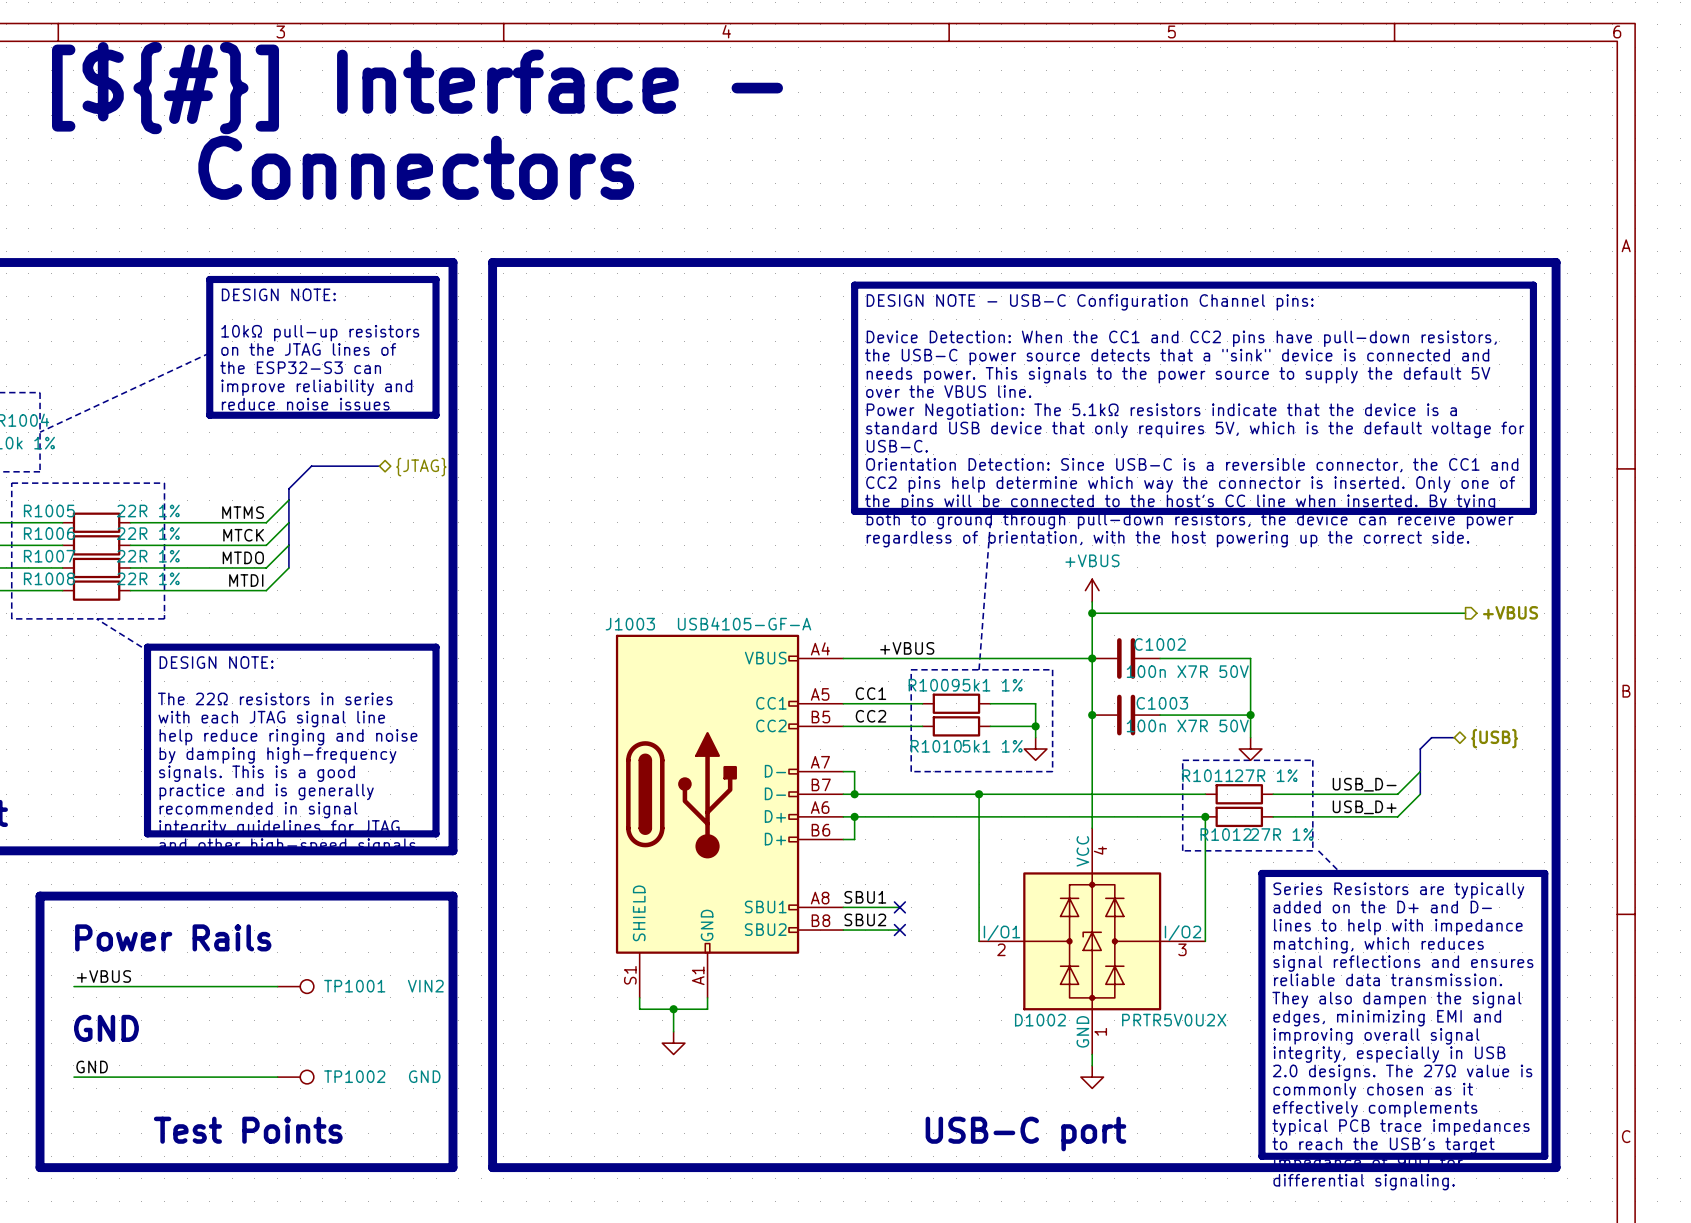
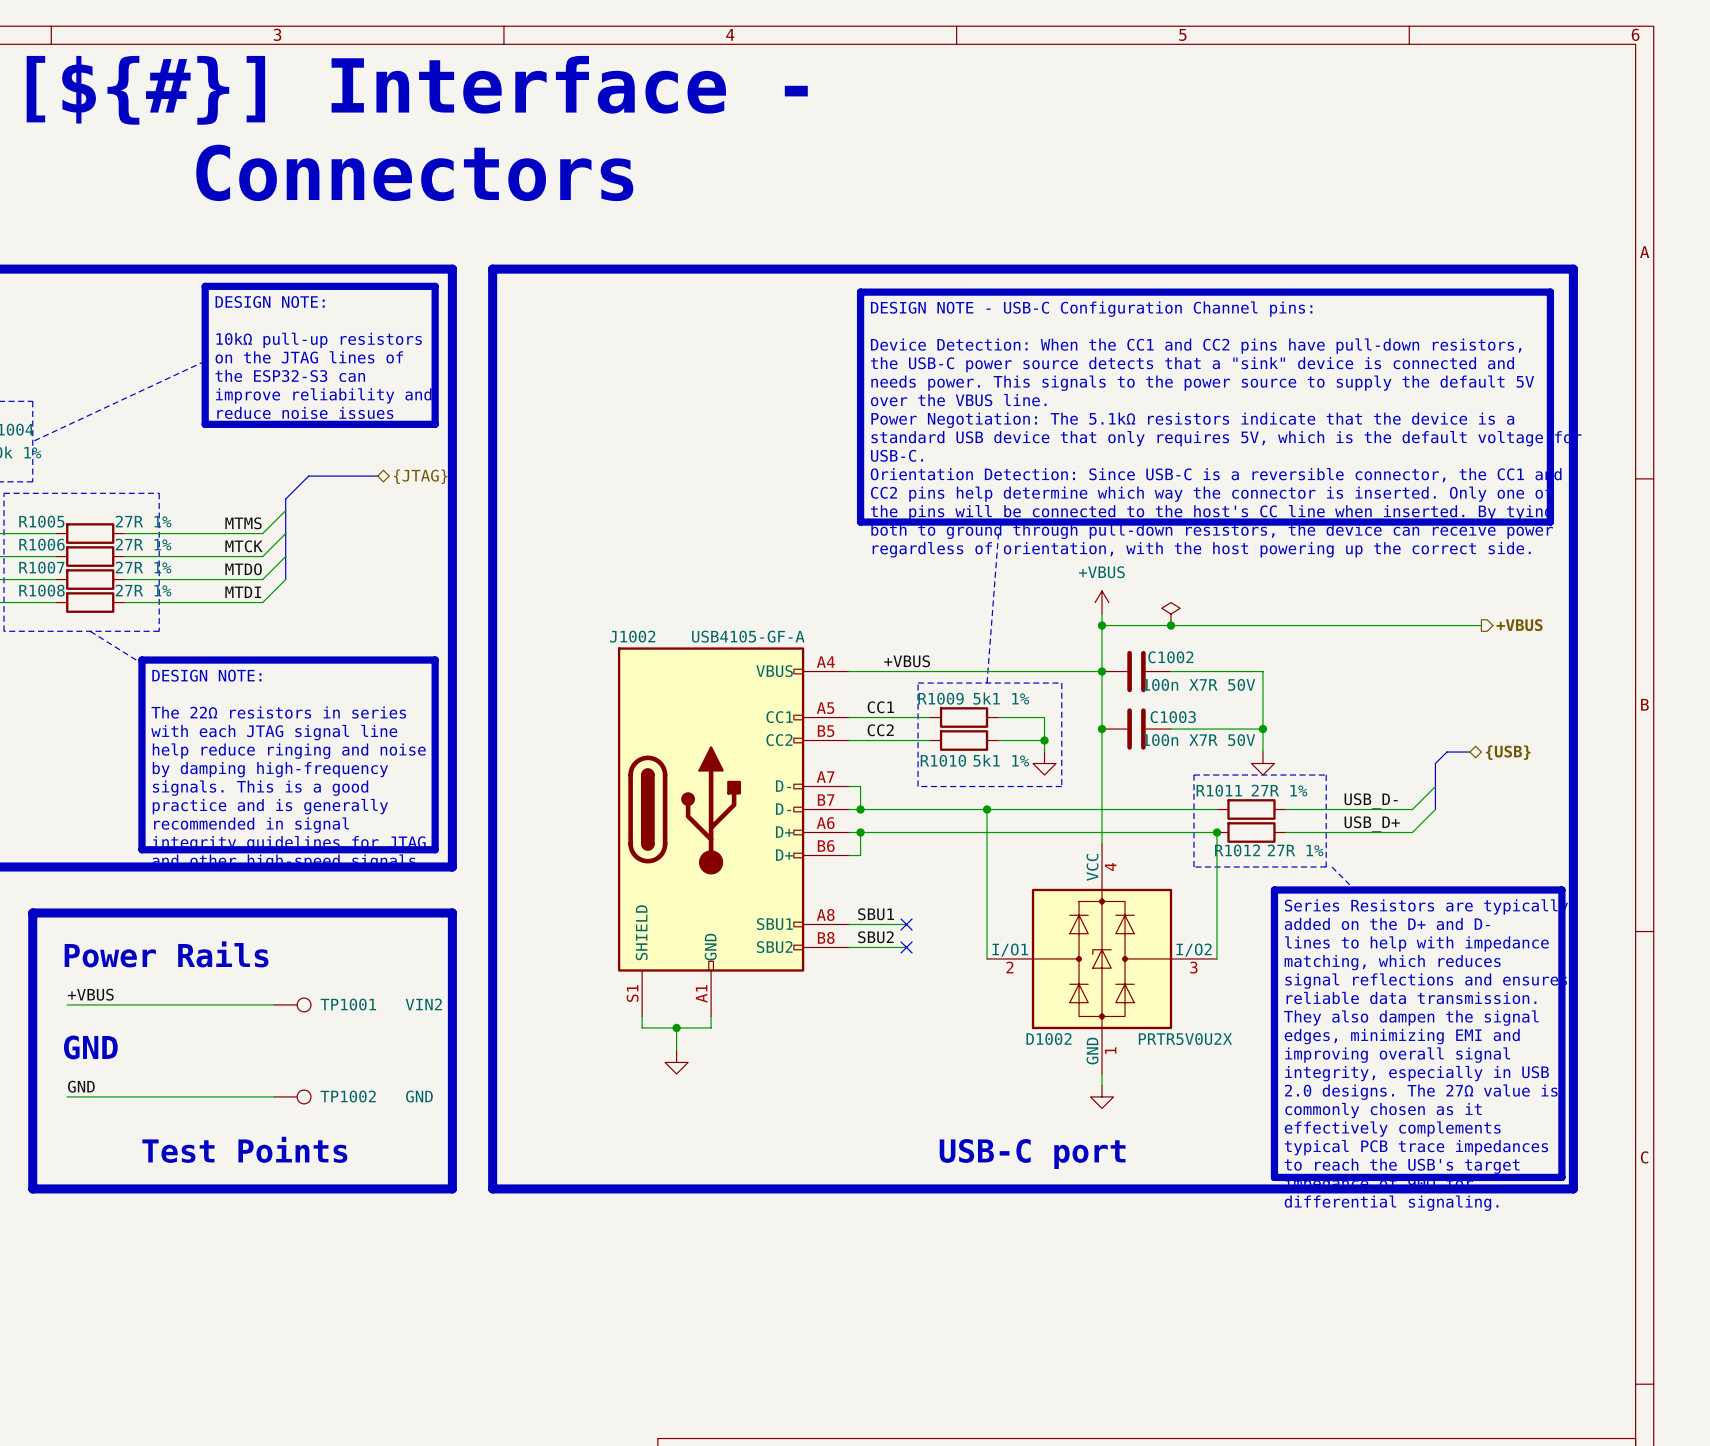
R1005 value: 22R 1% (148, 510) -> 27R 1% (143, 521)
R1006 value: 22R 1% (148, 533) -> 27R 1% (143, 544)
R1007 value: 22R 1% (148, 556) -> 27R 1% (143, 567)
R1008 value: 22R 1% (148, 578) -> 27R 1% (143, 590)
power symbol: none -> (1170, 614)
junction: none -> (1170, 625)
J1003 name: J1003 (630, 624) -> J1002 (632, 636)

